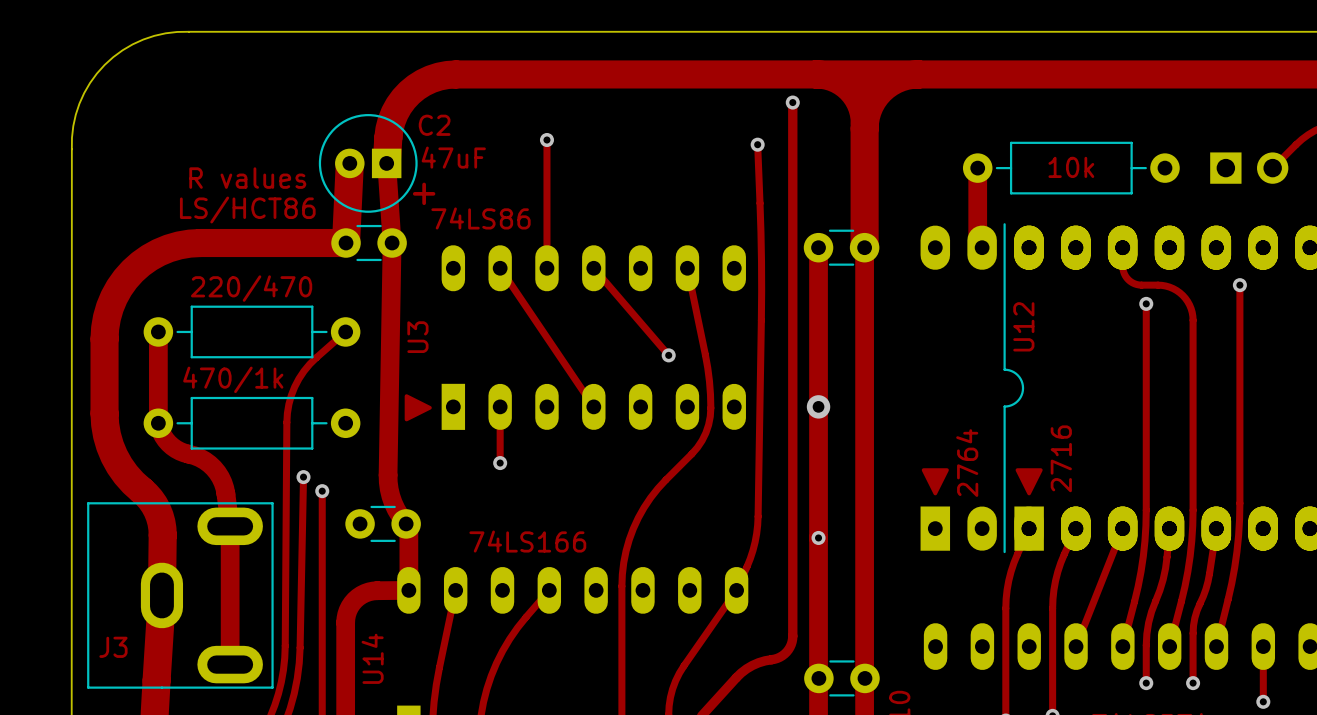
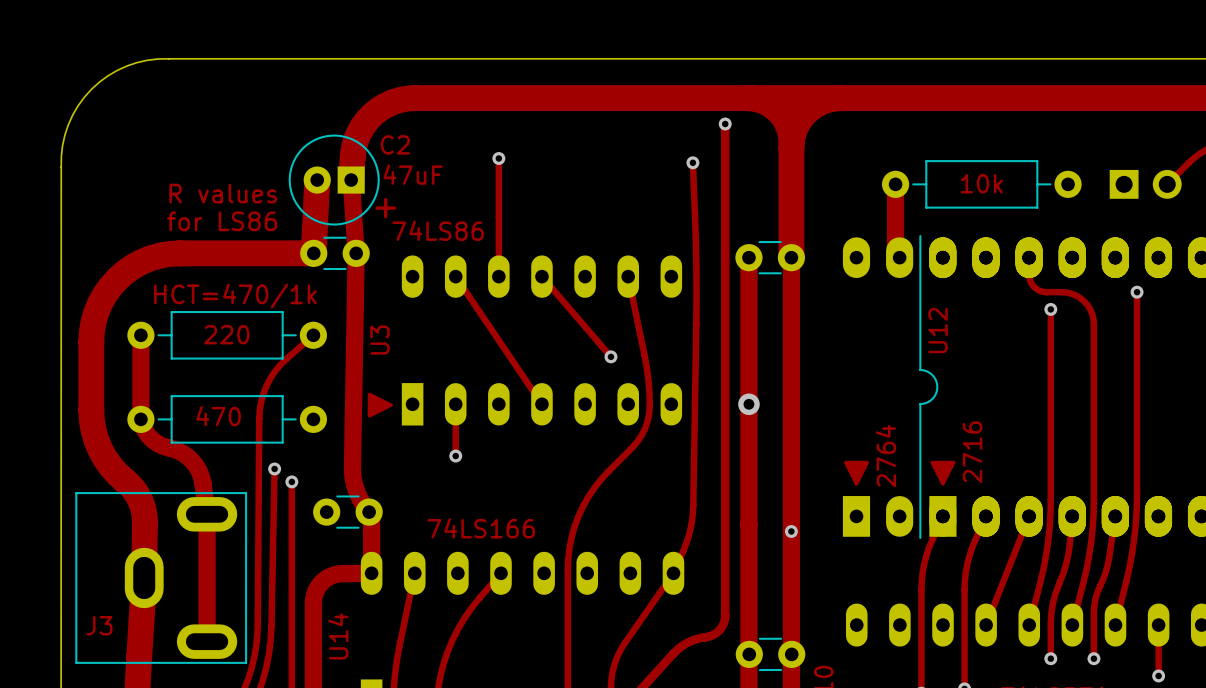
text: LS/HCT86 (247, 210) -> for LS86 (222, 221)
part value: 220/470 (251, 288) -> 220 (226, 334)
text: none -> HCT=470/1k (235, 296)
part value: 470/1k (233, 379) -> 470 (218, 416)
via position: (818, 537) -> (791, 531)

